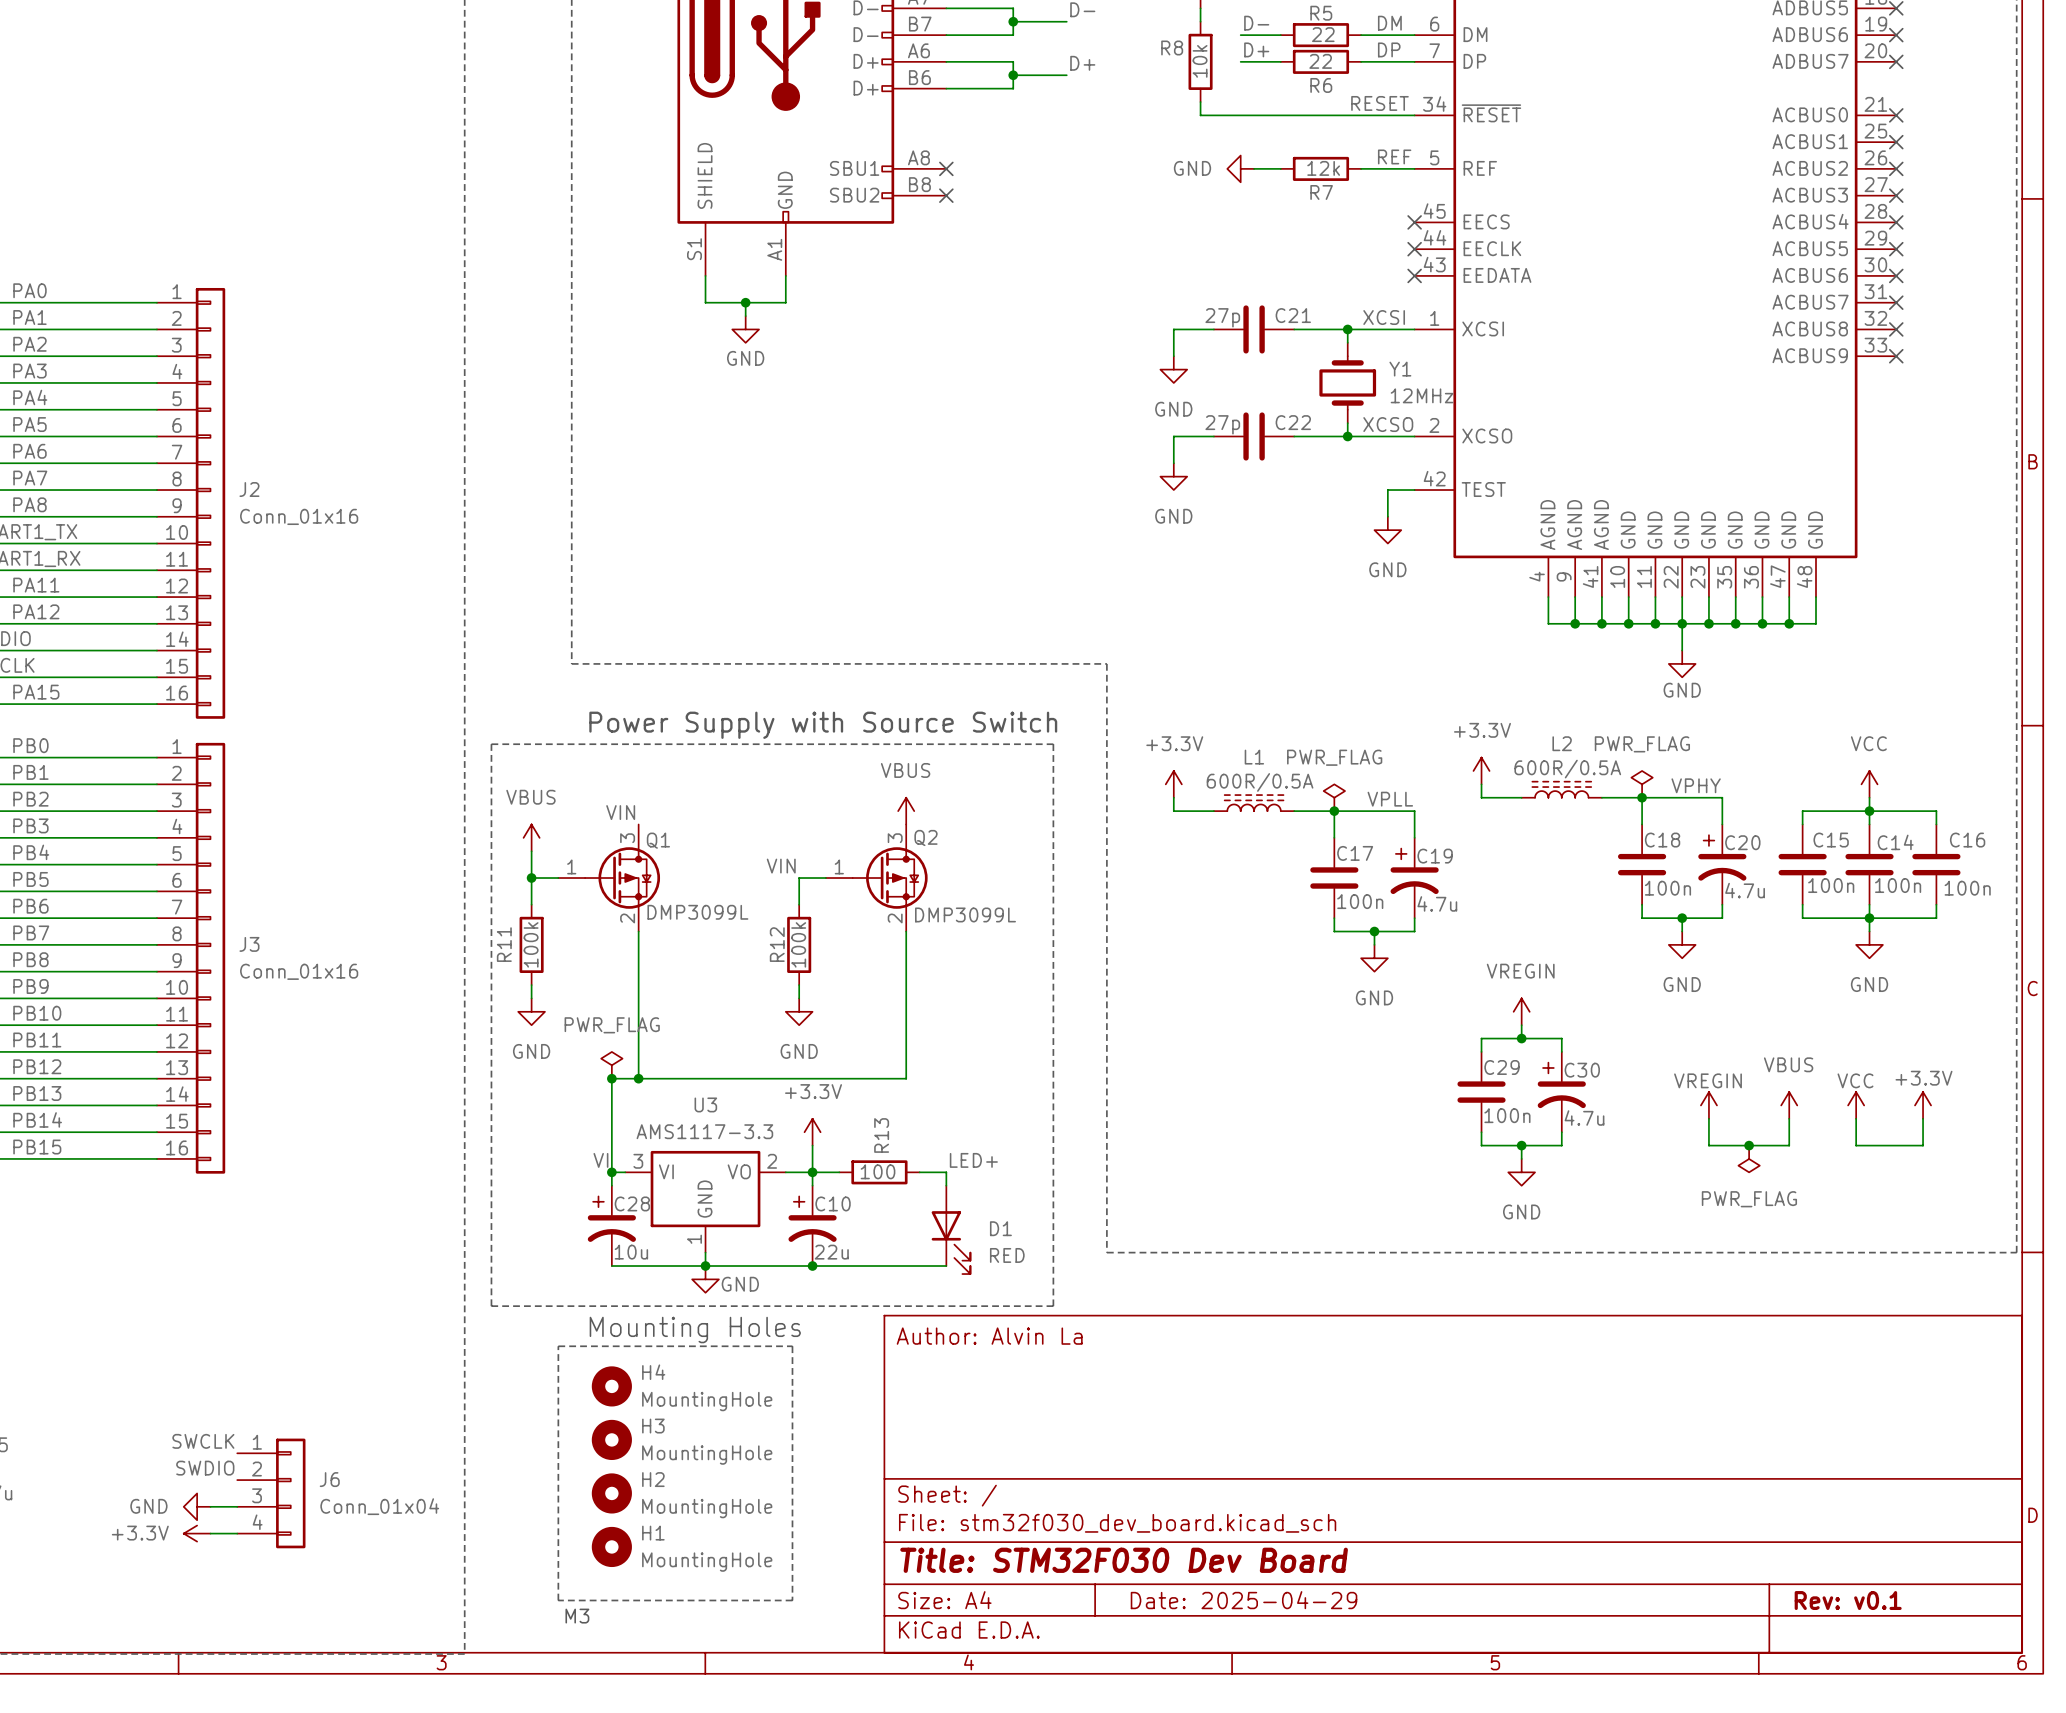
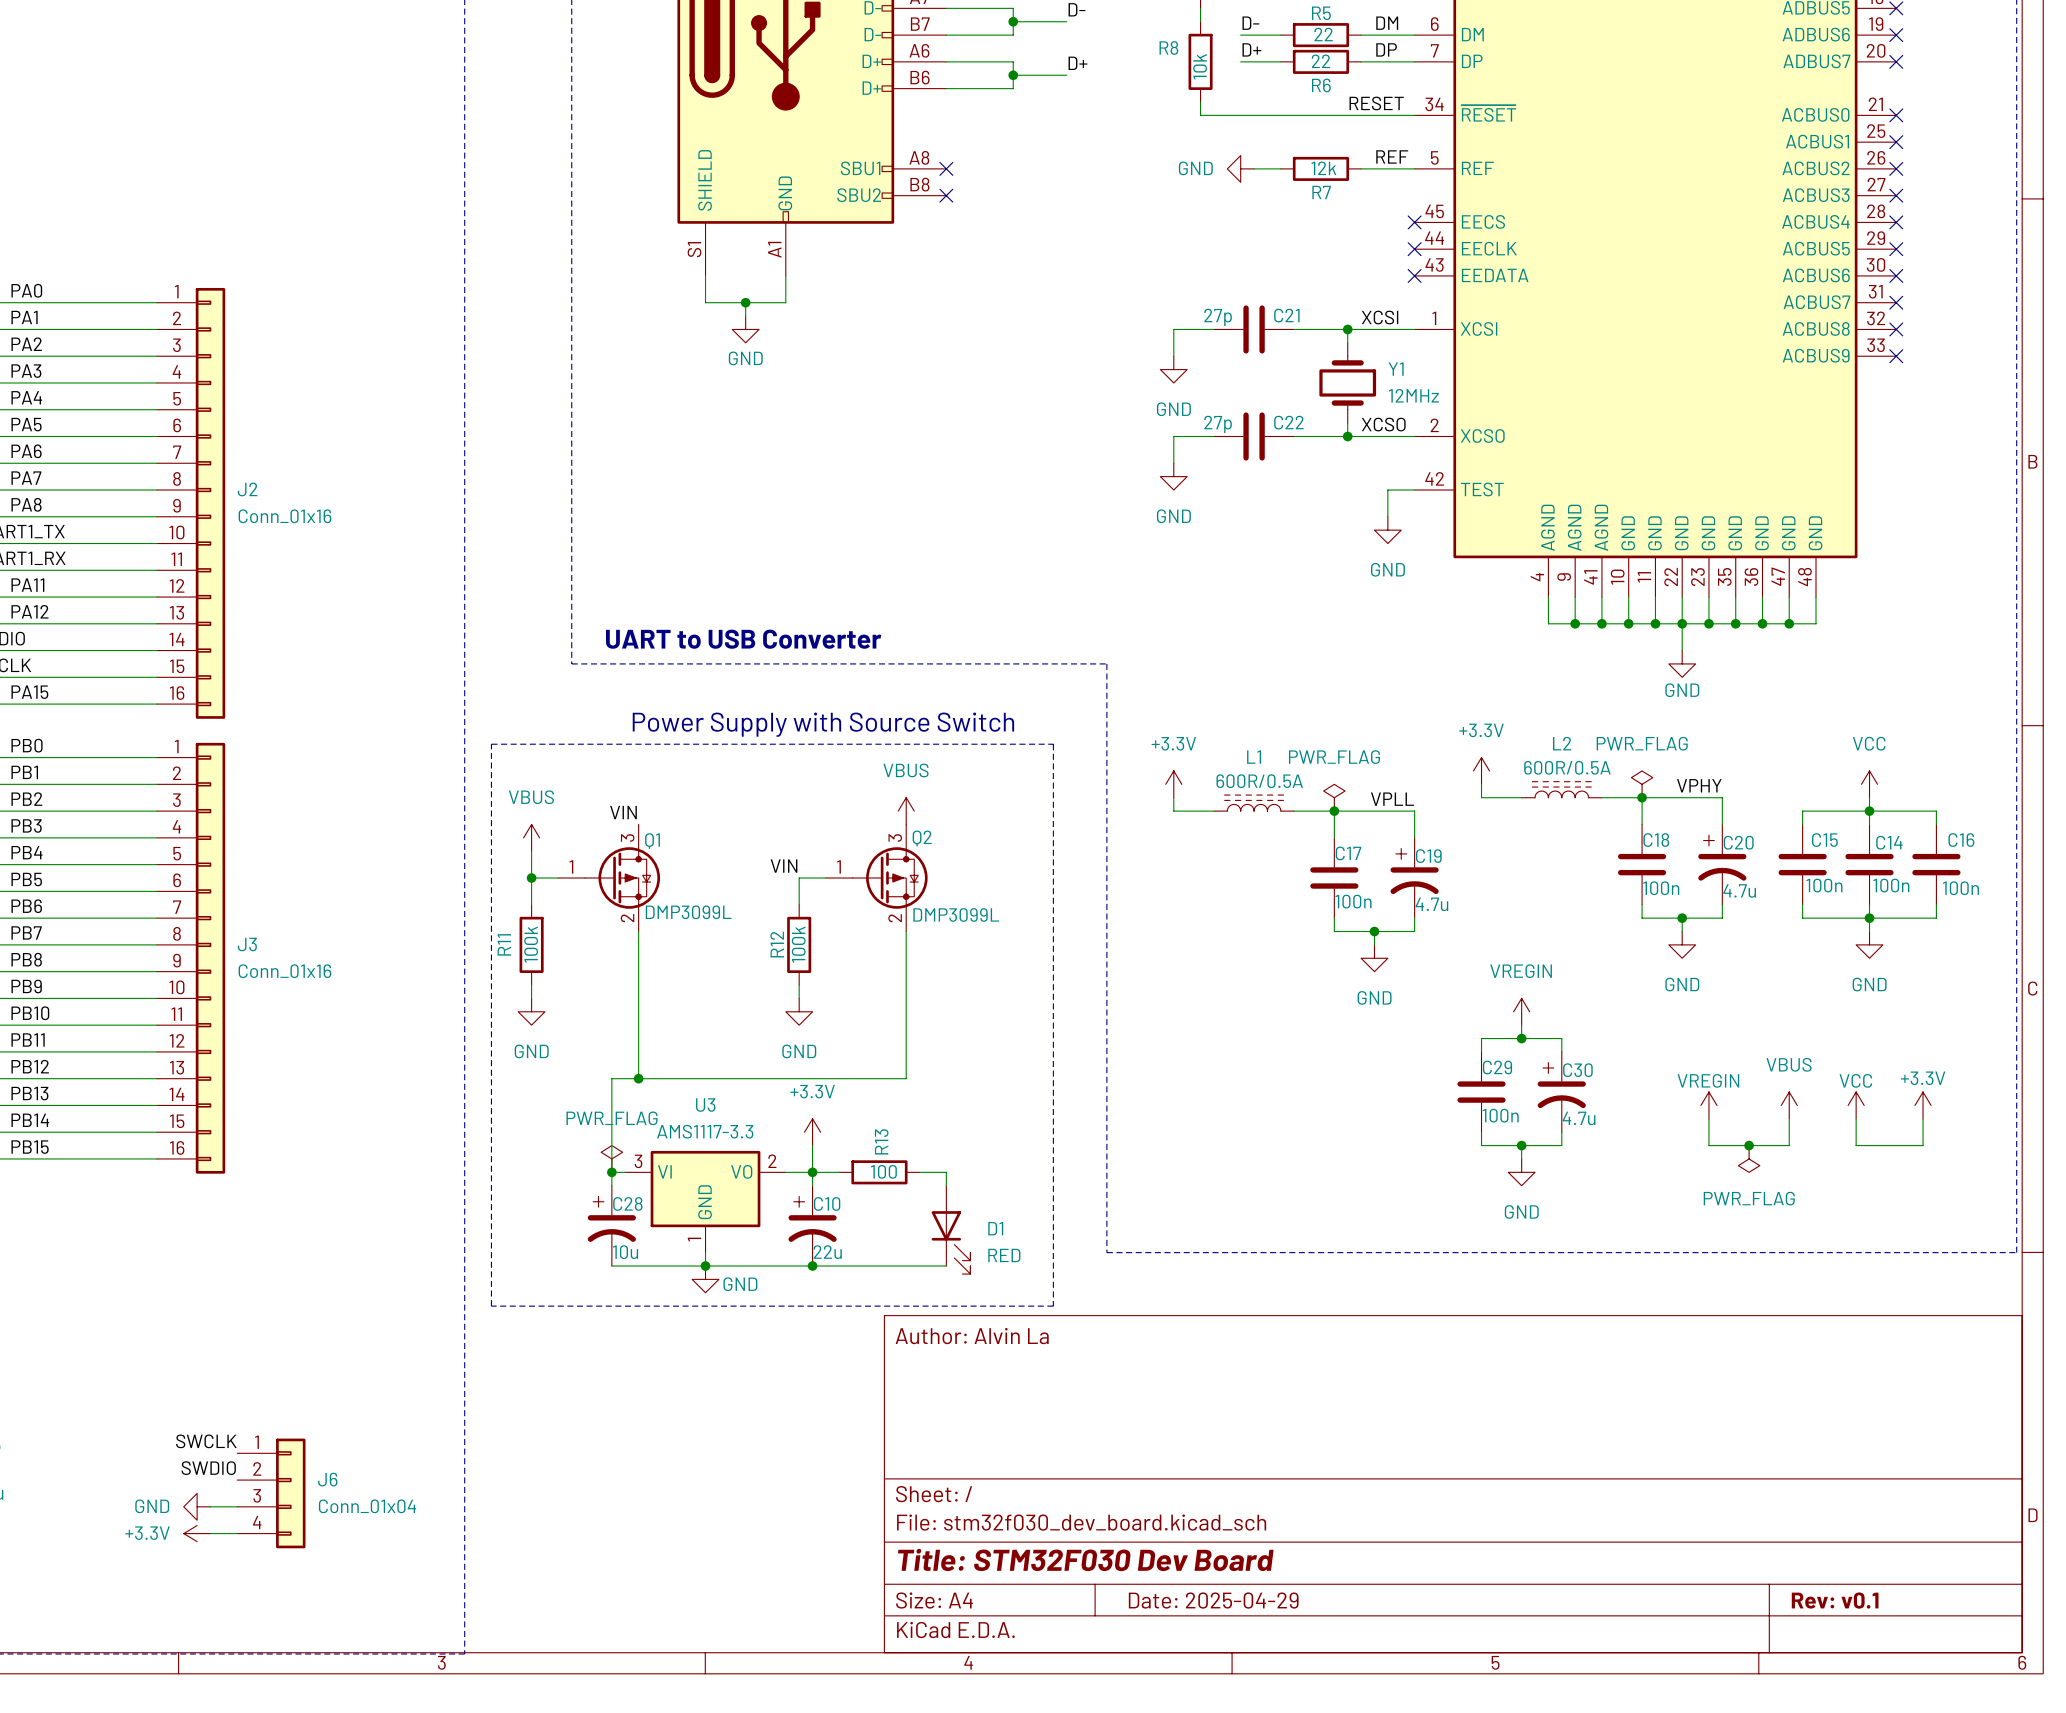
text: none -> UART to USB Converter (743, 639)
power symbol position: PWR_FLAG (611, 1065) -> PWR_FLAG (611, 1158)
junction: (611, 1078) -> none
label: VI (600, 1160) -> none
label: LED+ (973, 1160) -> none
text: Mounting Holes (695, 1330) -> none
line: (558, 1346) (792, 1346) (792, 1600) (558, 1600) (558, 1346) -> none
H4: MountingHole (611, 1386) -> none
H3: MountingHole (611, 1439) -> none
H2: MountingHole (611, 1493) -> none
H1: MountingHole (611, 1546) -> none
text: M3 (577, 1616) -> none

